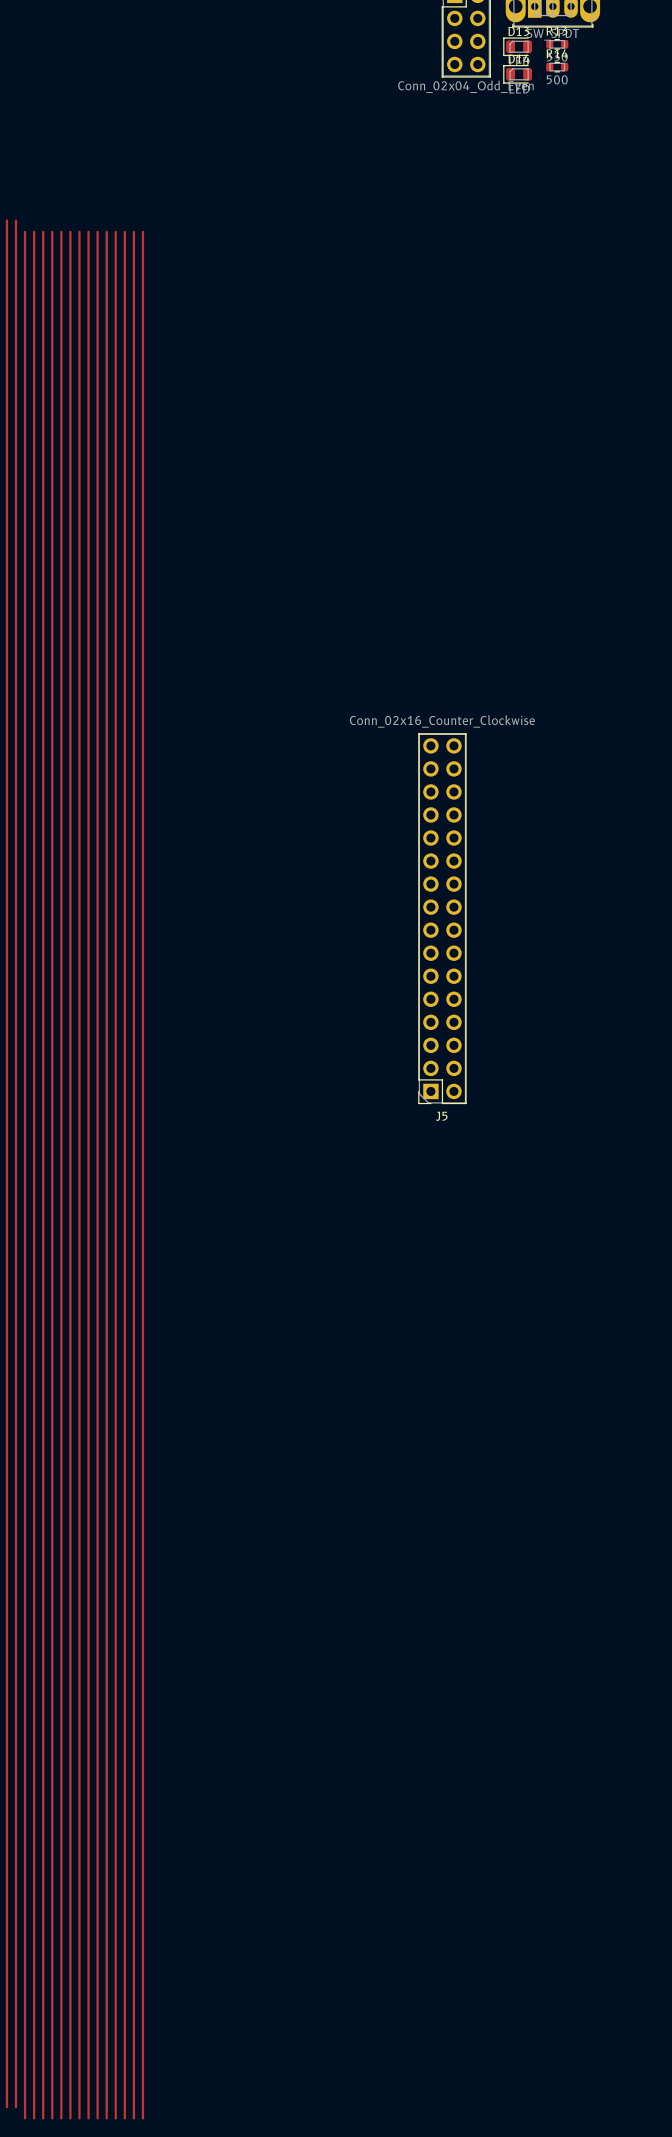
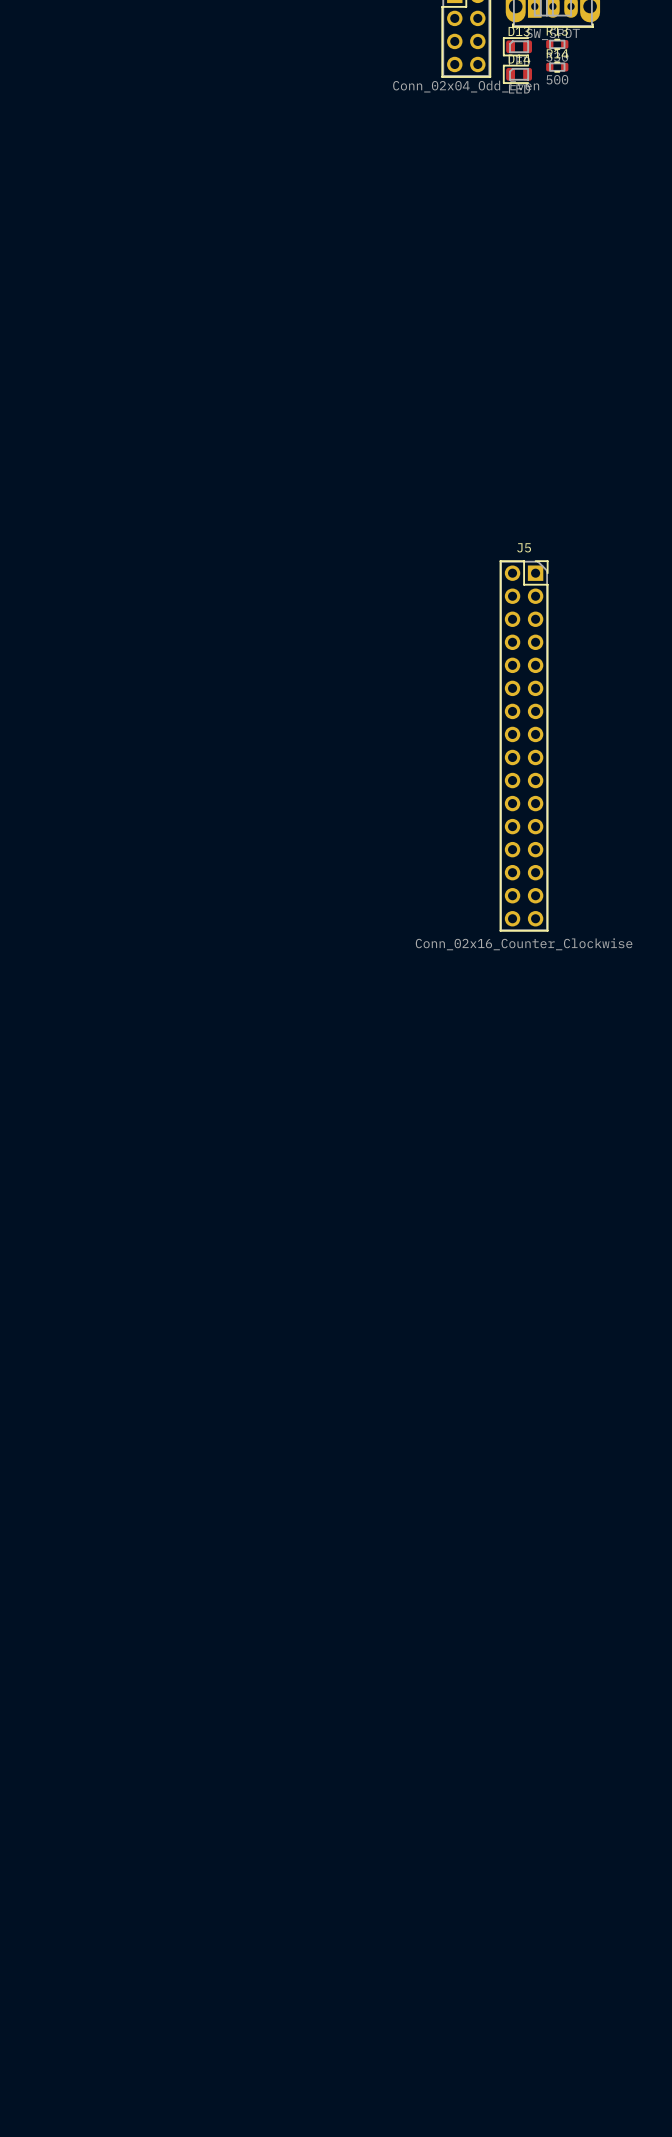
top track: (6, 220) (6, 2107) -> none
top track: (15, 220) (15, 2107) -> none
top track: (25, 231) (25, 2118) -> none
top track: (34, 231) (34, 2118) -> none
top track: (43, 231) (43, 2118) -> none
top track: (52, 231) (52, 2118) -> none
top track: (61, 231) (61, 2118) -> none
top track: (70, 231) (70, 2118) -> none
top track: (79, 231) (79, 2118) -> none
top track: (88, 231) (88, 2118) -> none
top track: (97, 231) (97, 2118) -> none
top track: (106, 231) (106, 2118) -> none
top track: (115, 231) (115, 2118) -> none
top track: (124, 231) (124, 2118) -> none
top track: (133, 231) (133, 2118) -> none
top track: (142, 231) (142, 2118) -> none
J5 rotation: 0° (442, 918) -> 180° (524, 745)

